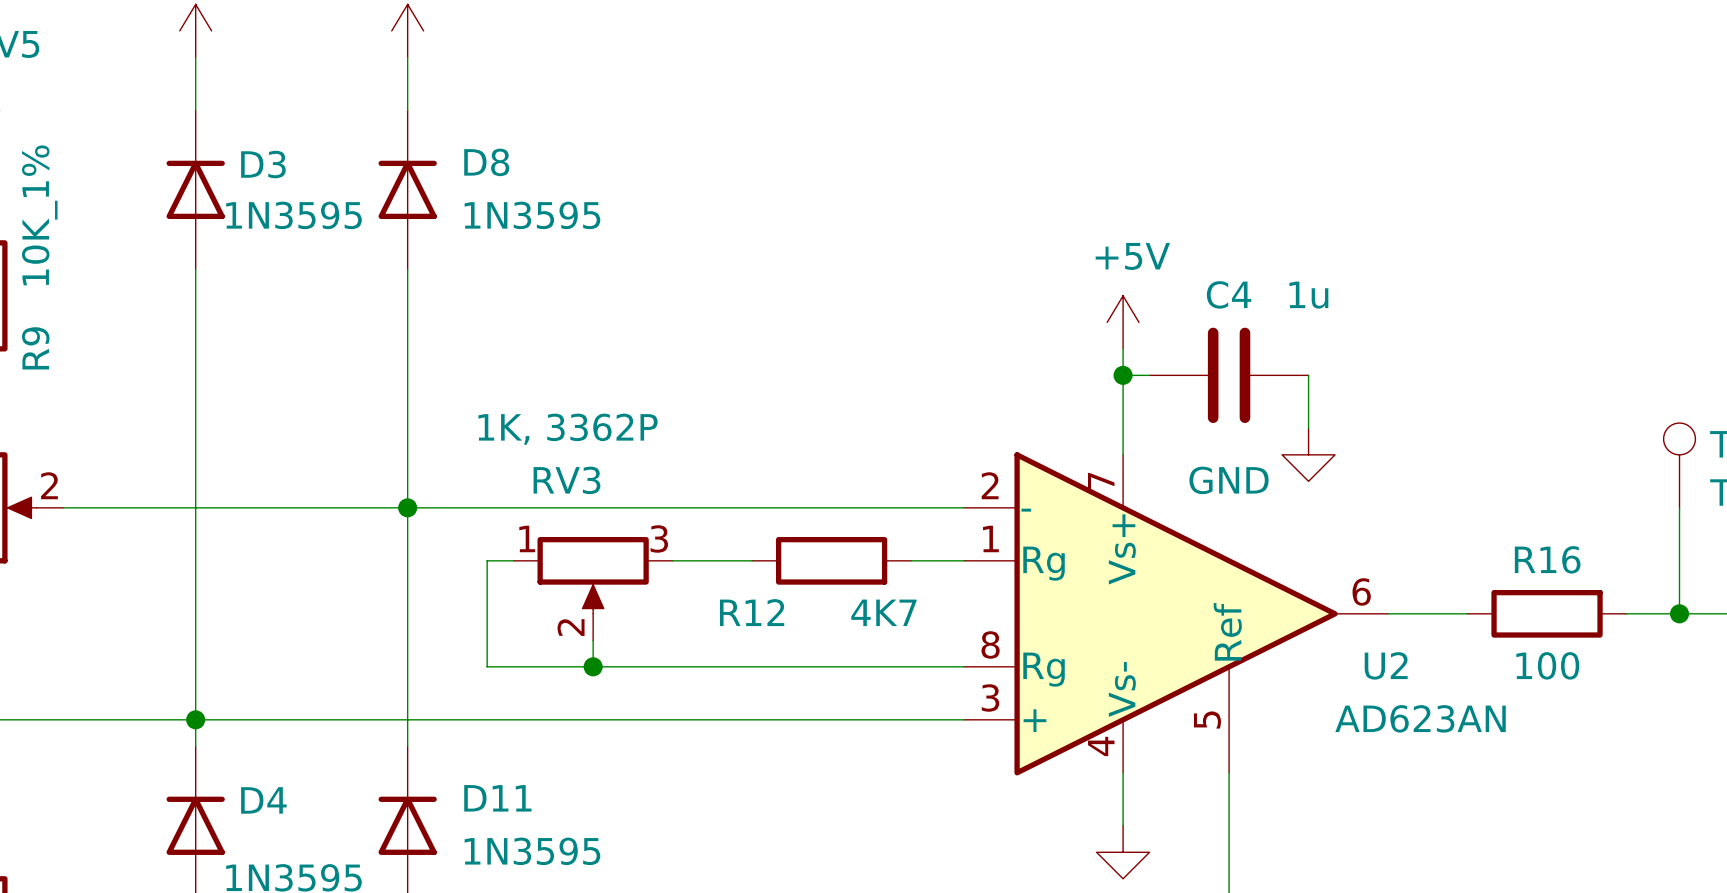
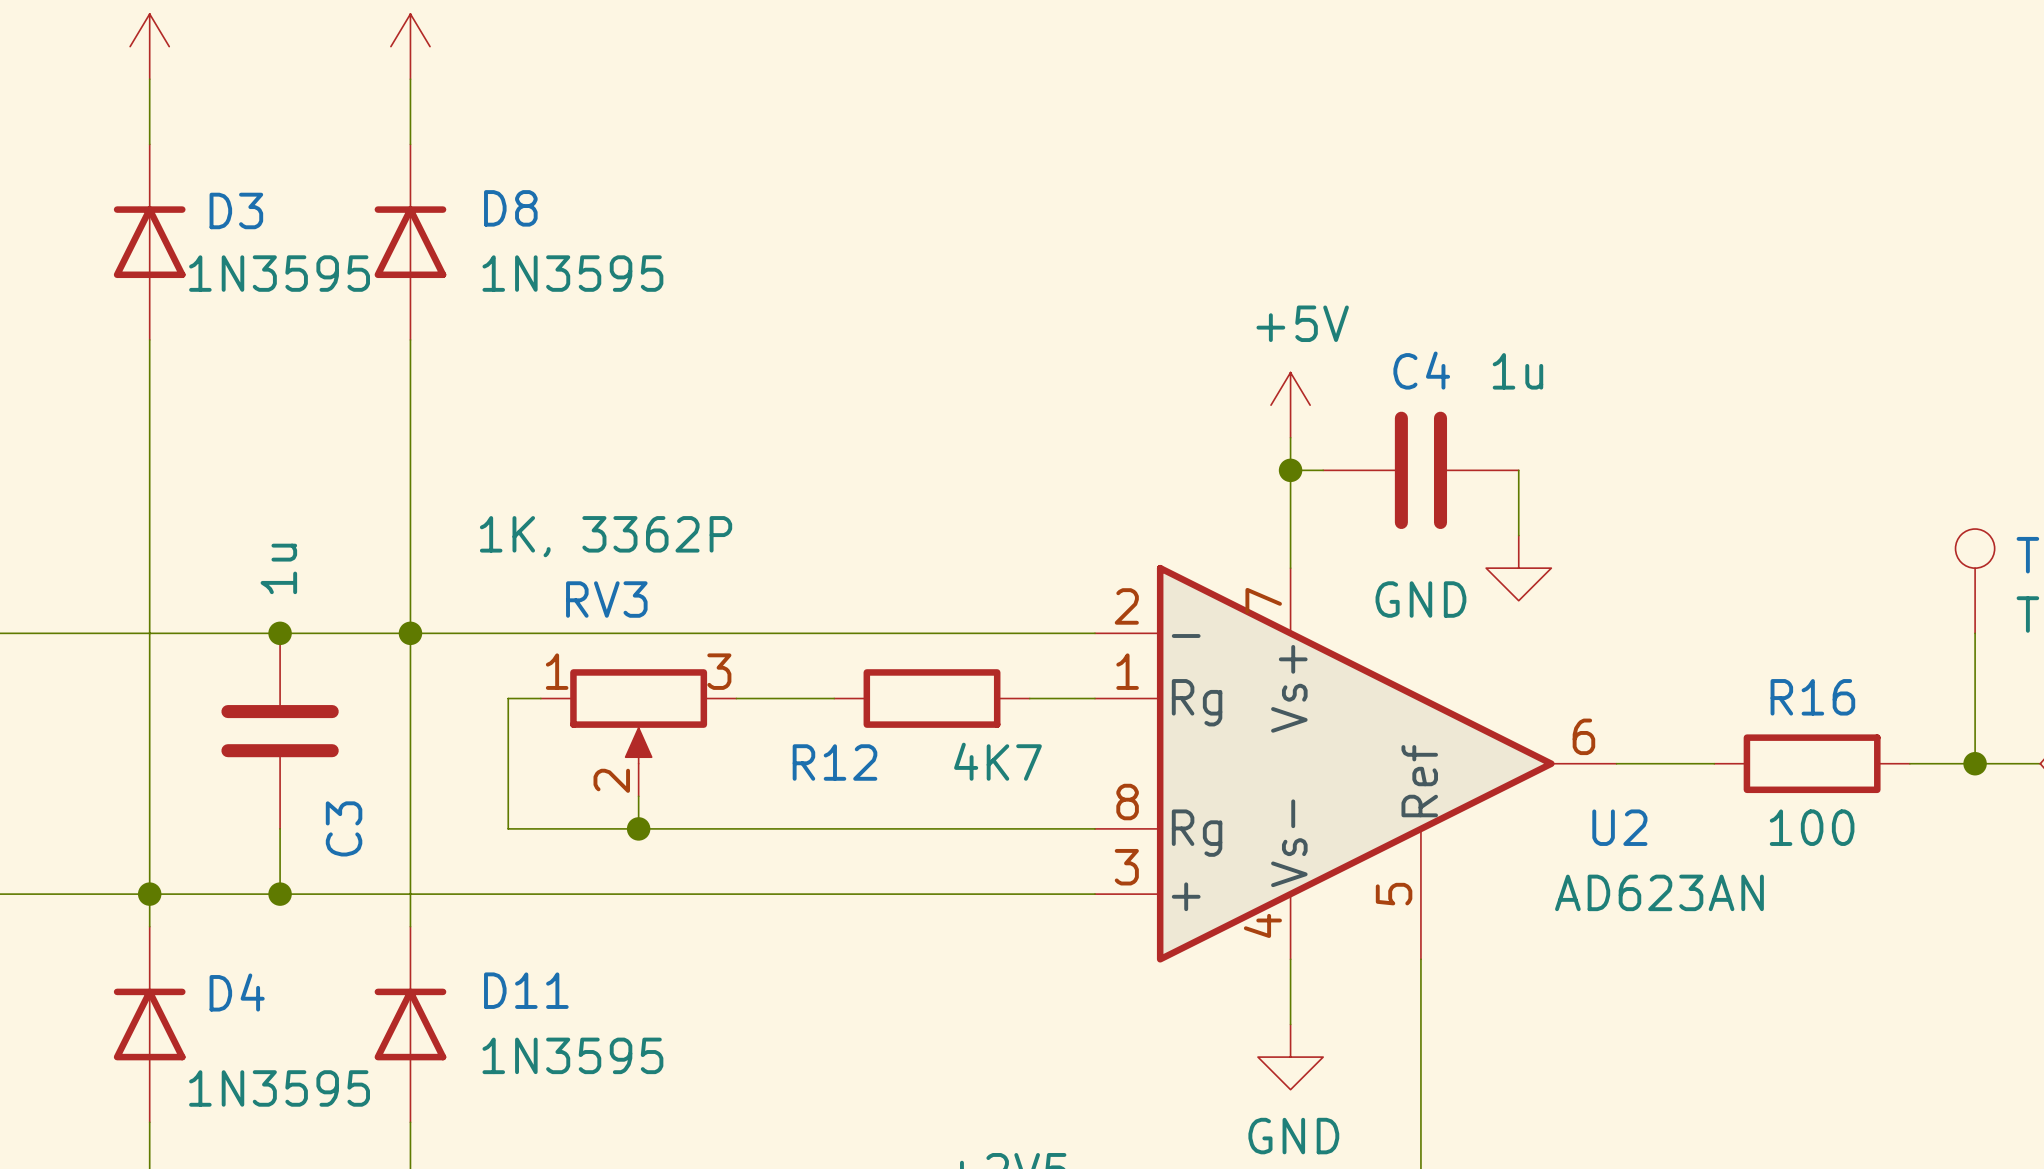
junction: none -> (280, 633)
C3: none -> 1u (280, 731)
wire: none -> (280, 828) (280, 894)
junction: none -> (280, 894)

